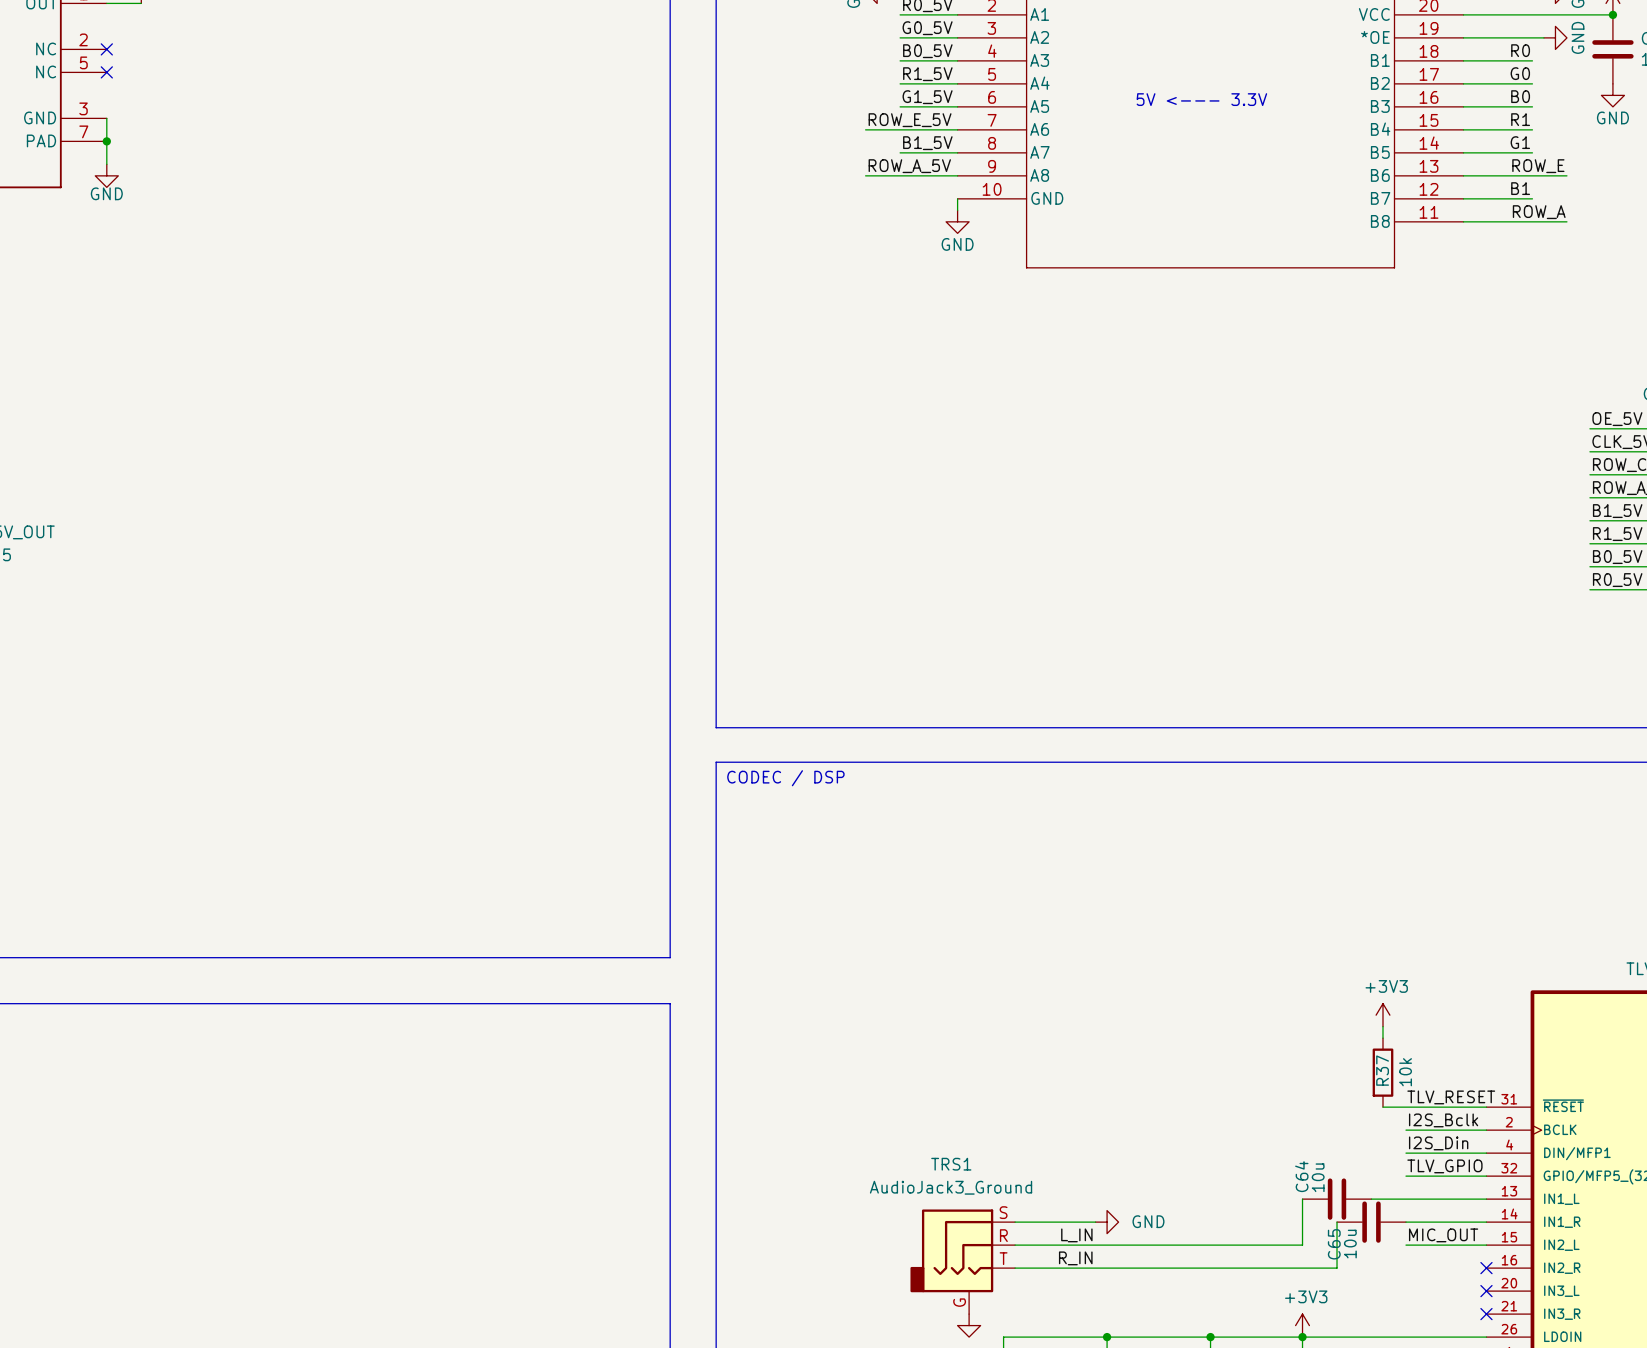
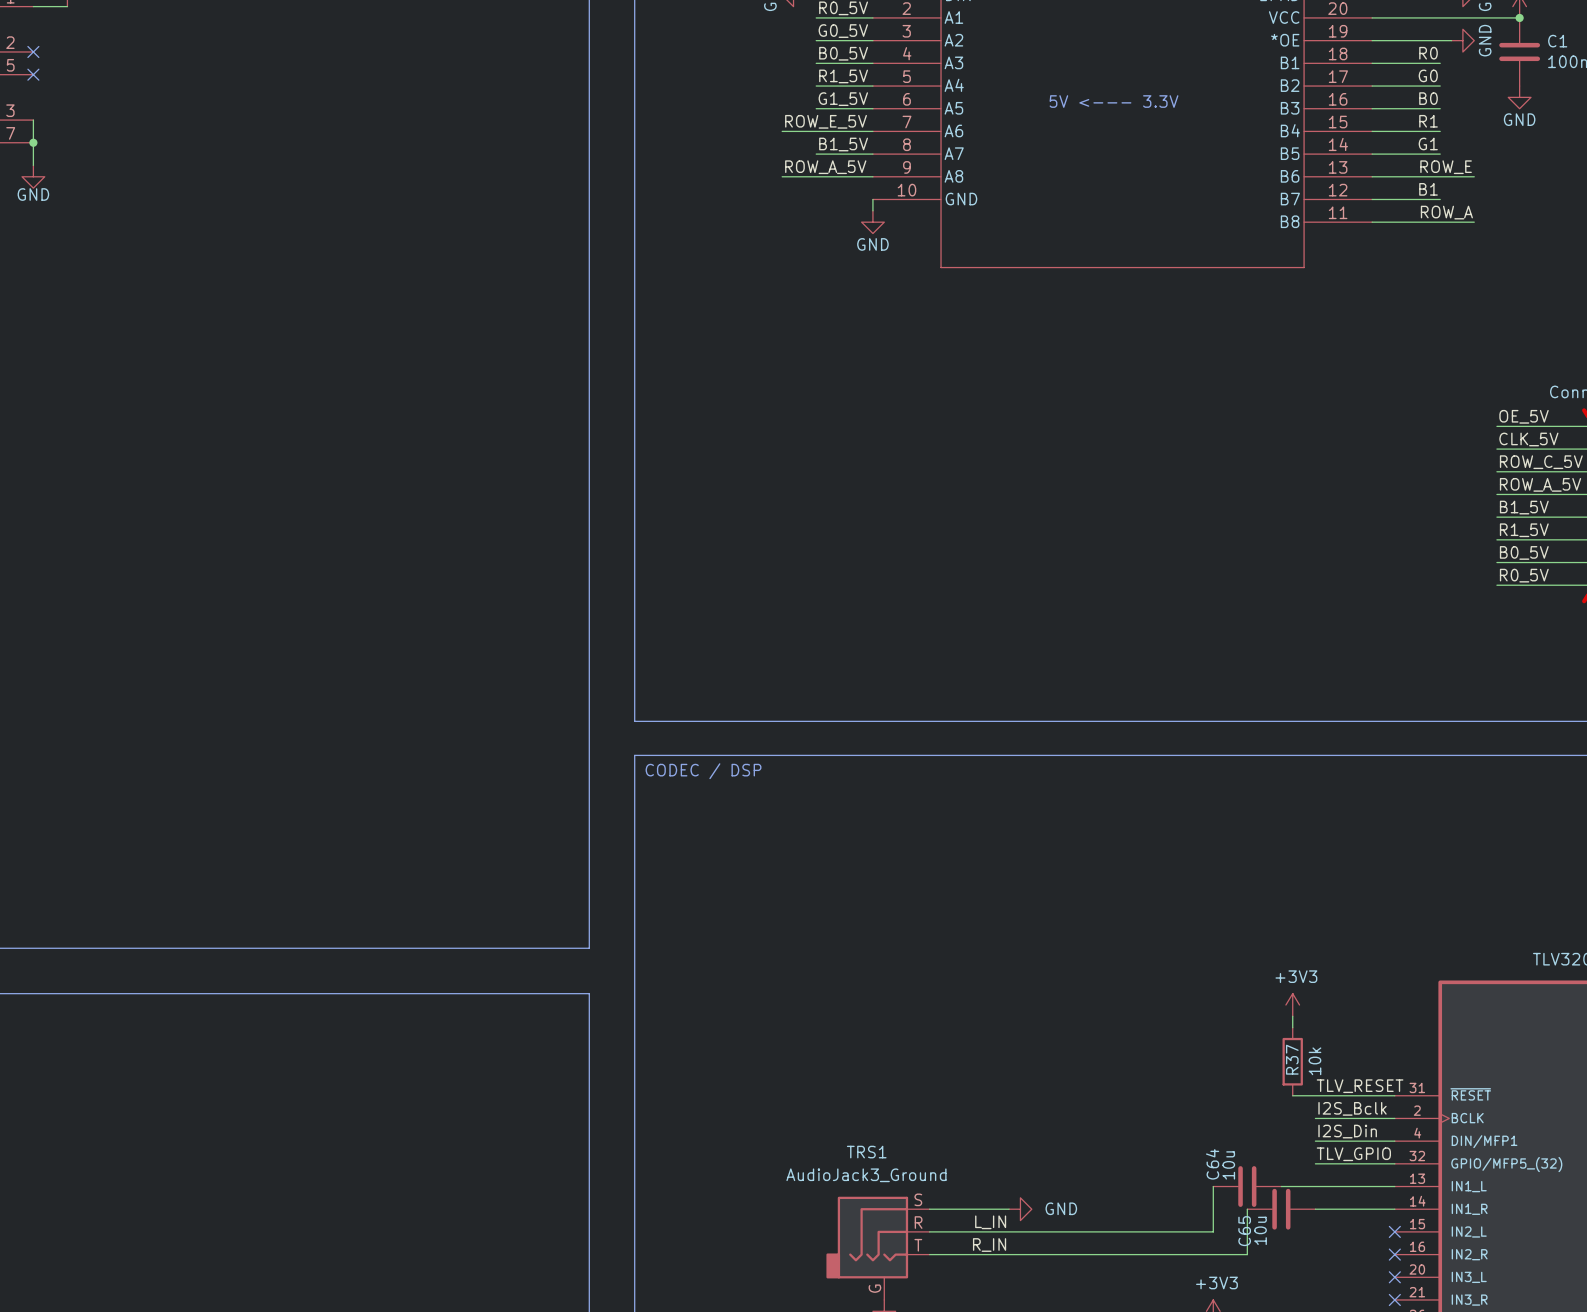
label: MIC_OUT (1443, 1235) -> none
wire: (1405, 1245) (1486, 1245) -> none
no-connect mark: none -> (1394, 1231)

